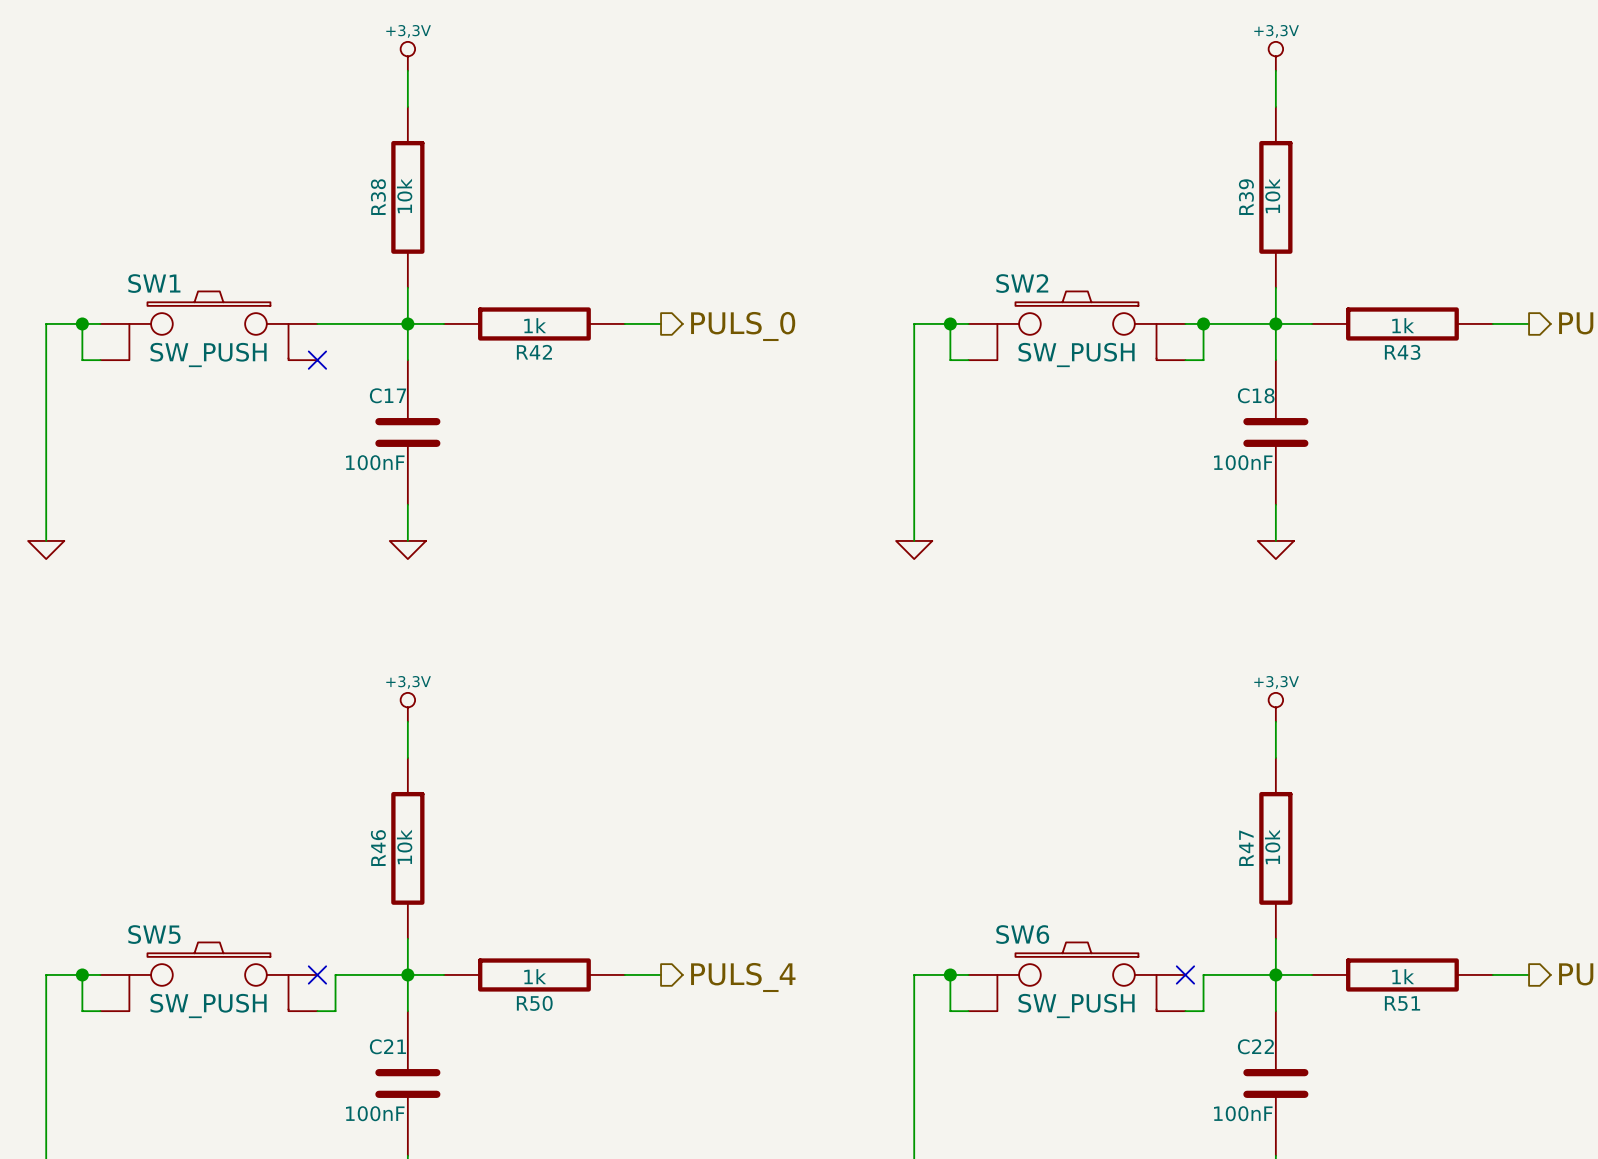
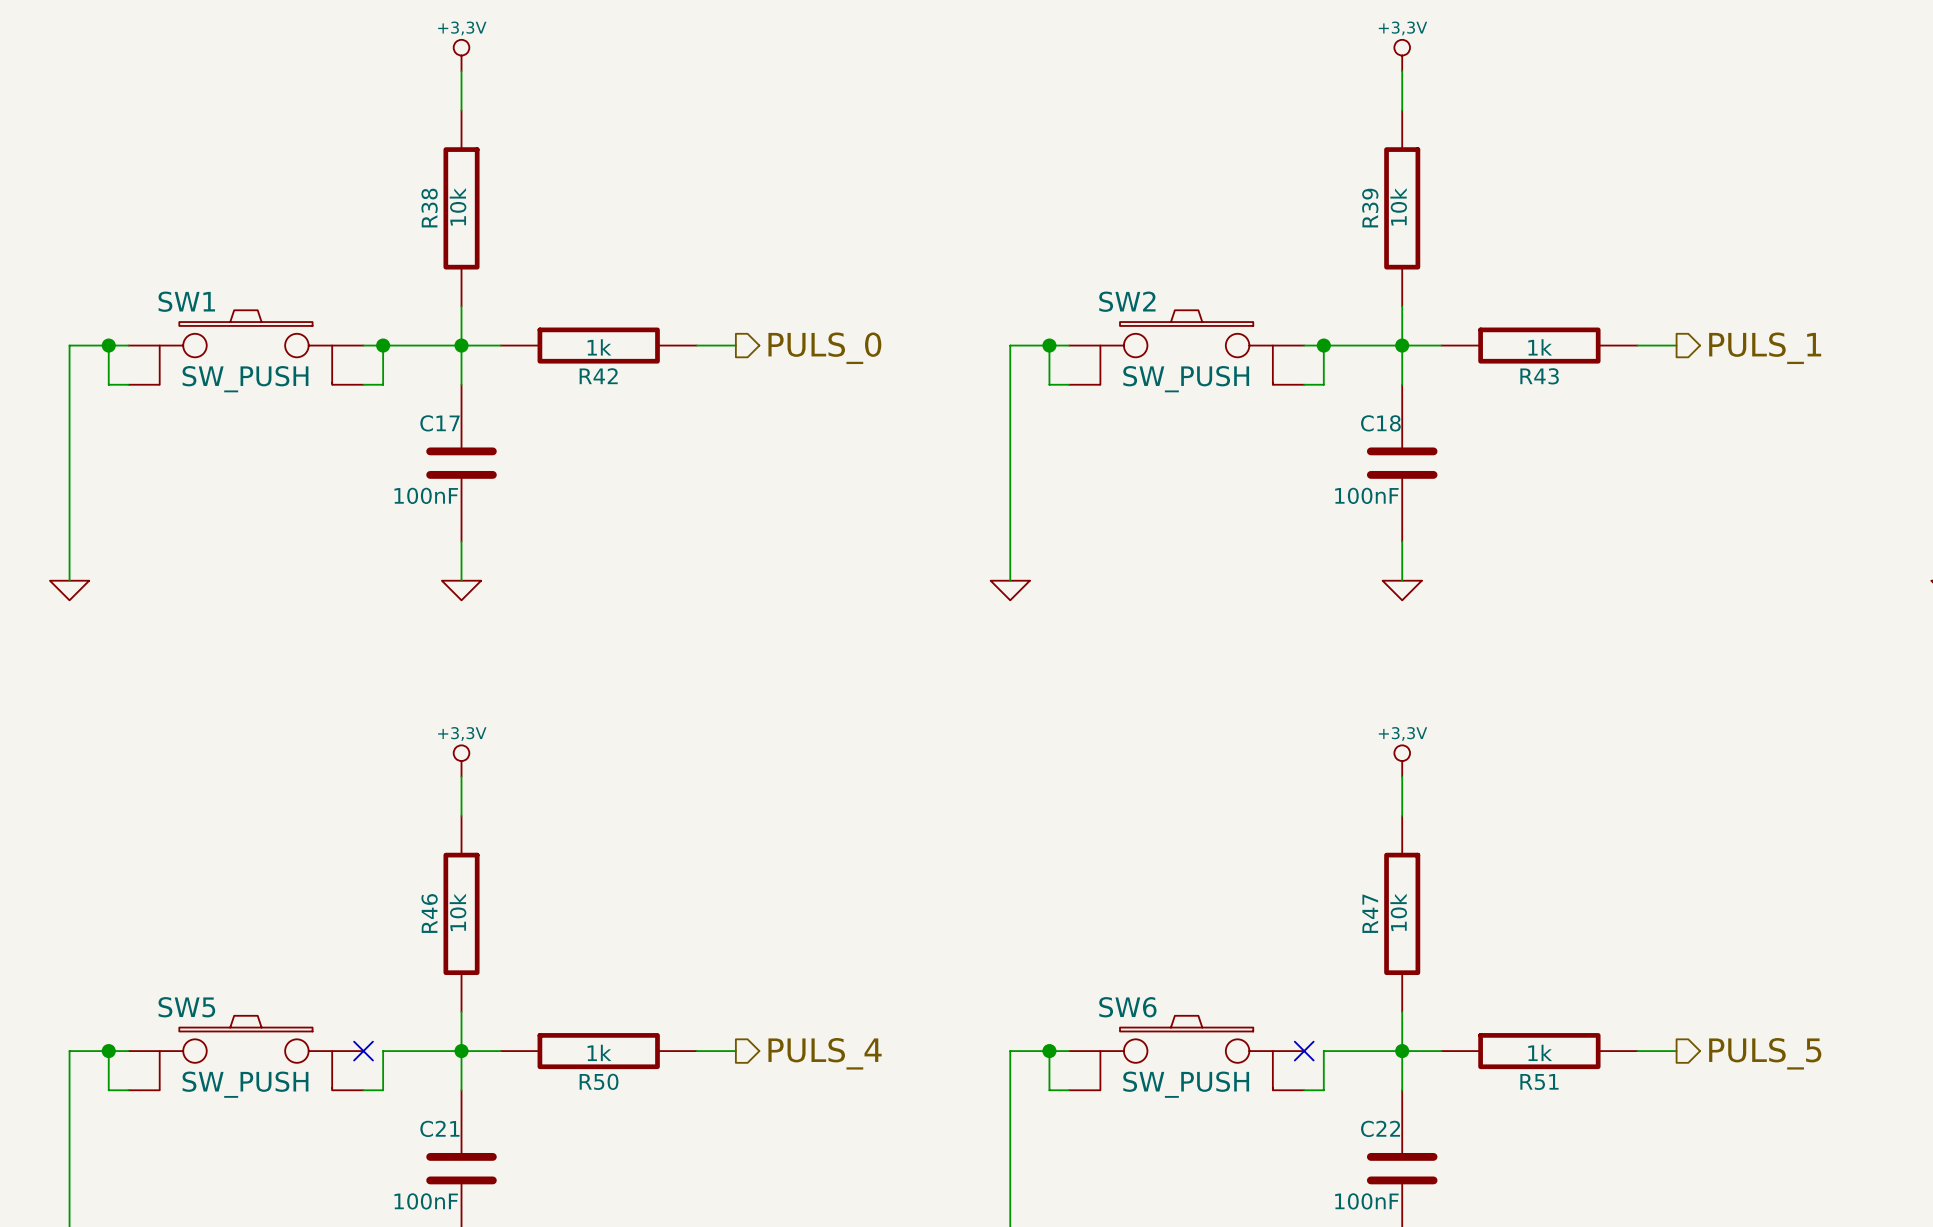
wire: none -> (383, 345) (383, 384) (363, 384)
junction: none -> (383, 345)
no-connect mark: (317, 360) -> none

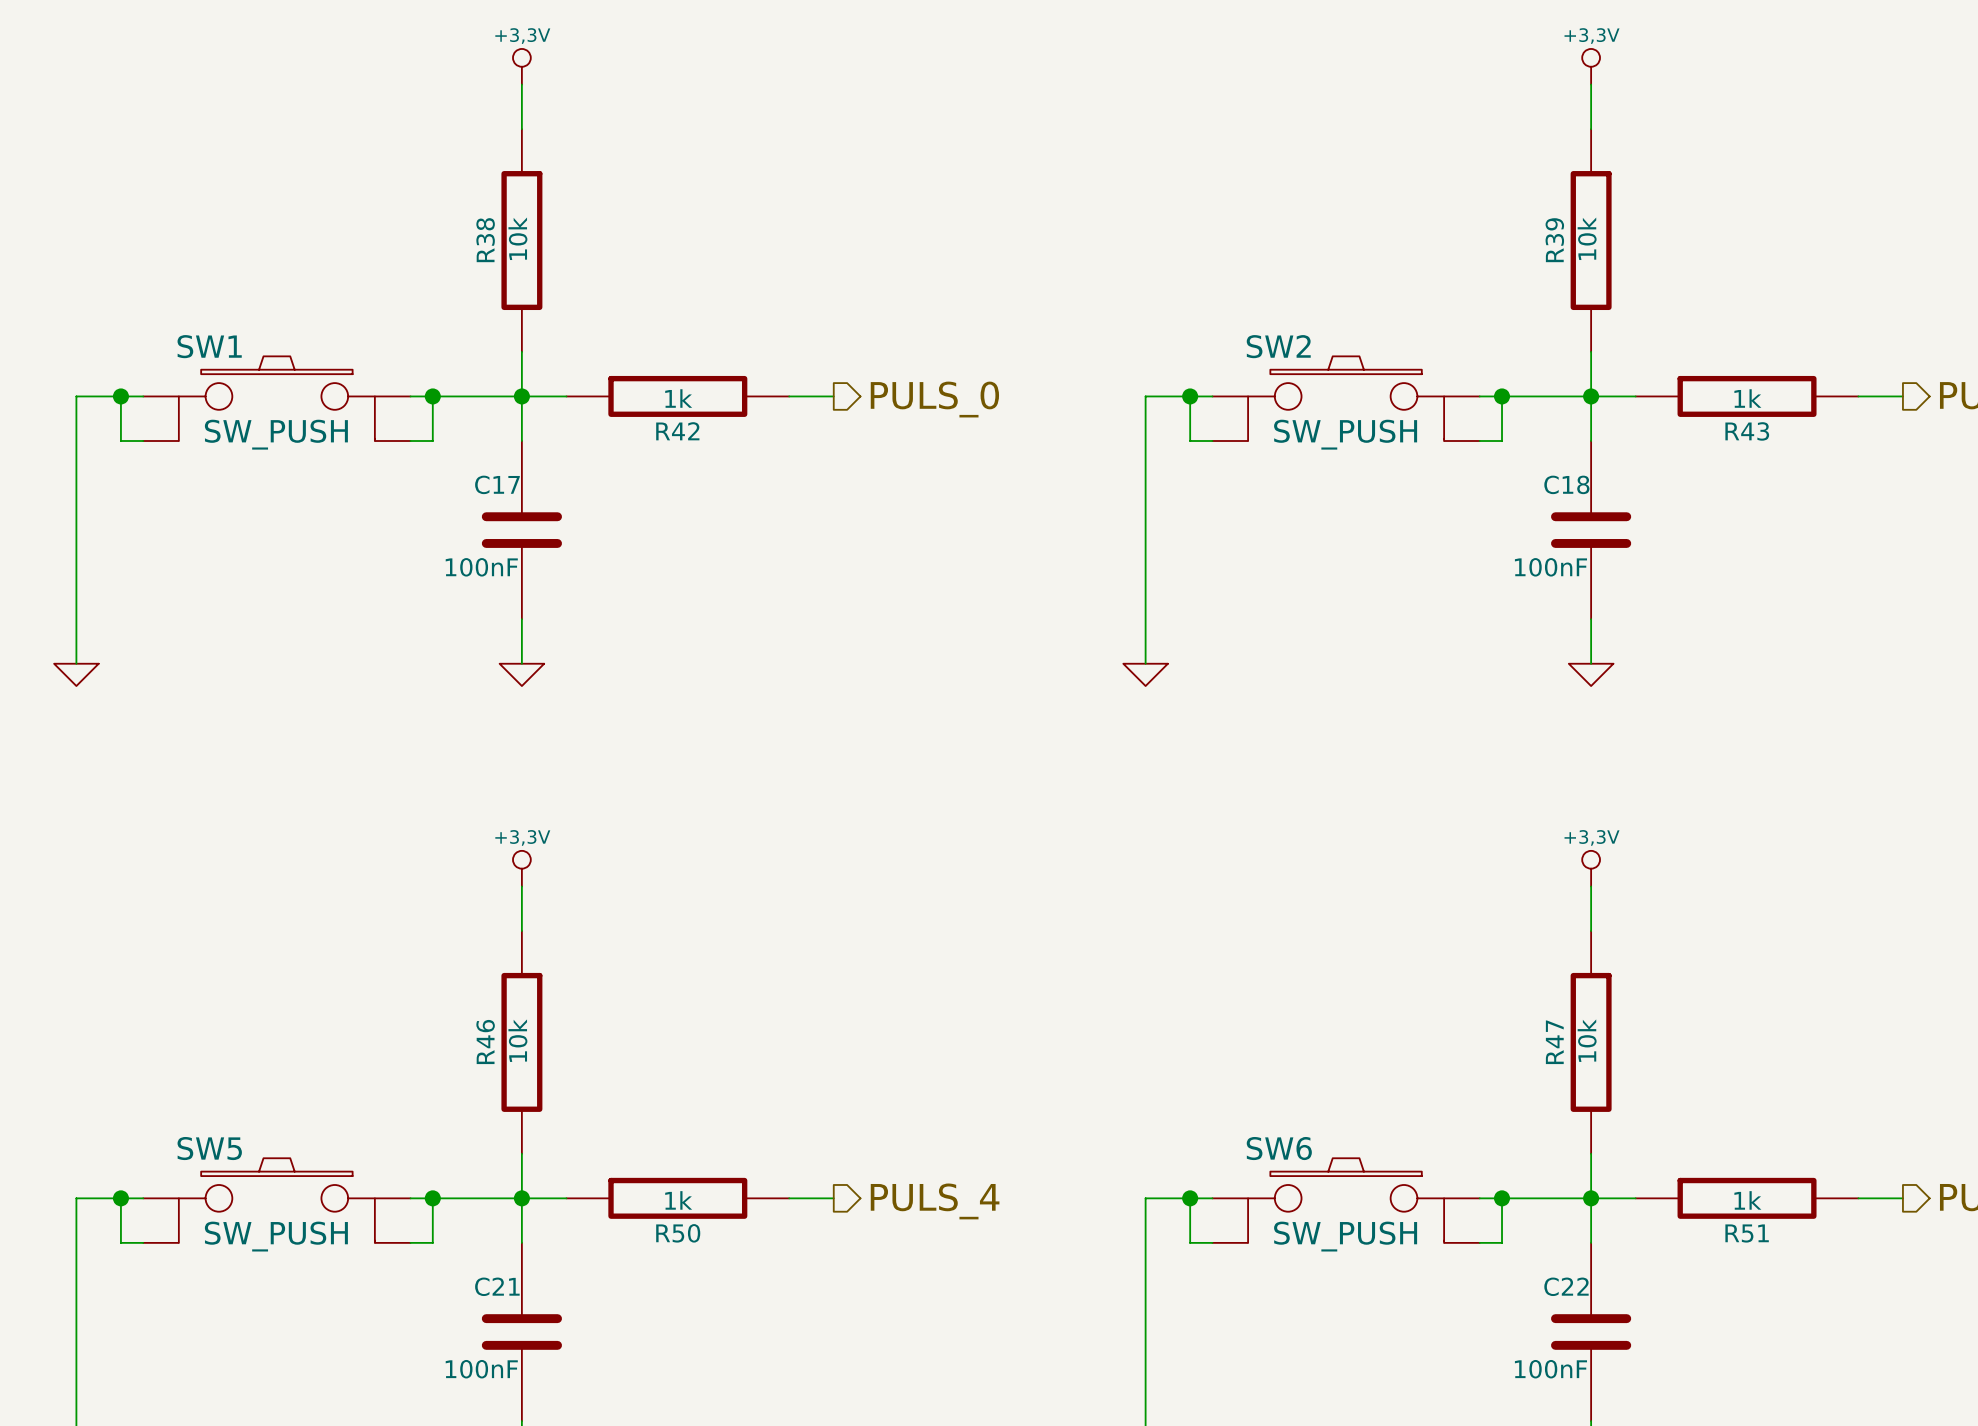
wire: none -> (410, 1198) (432, 1198)
no-connect mark: (363, 1051) -> none
junction: none -> (432, 1198)
wire: none -> (1479, 1198) (1502, 1198)
no-connect mark: (1304, 1051) -> none
junction: none -> (1502, 1198)

